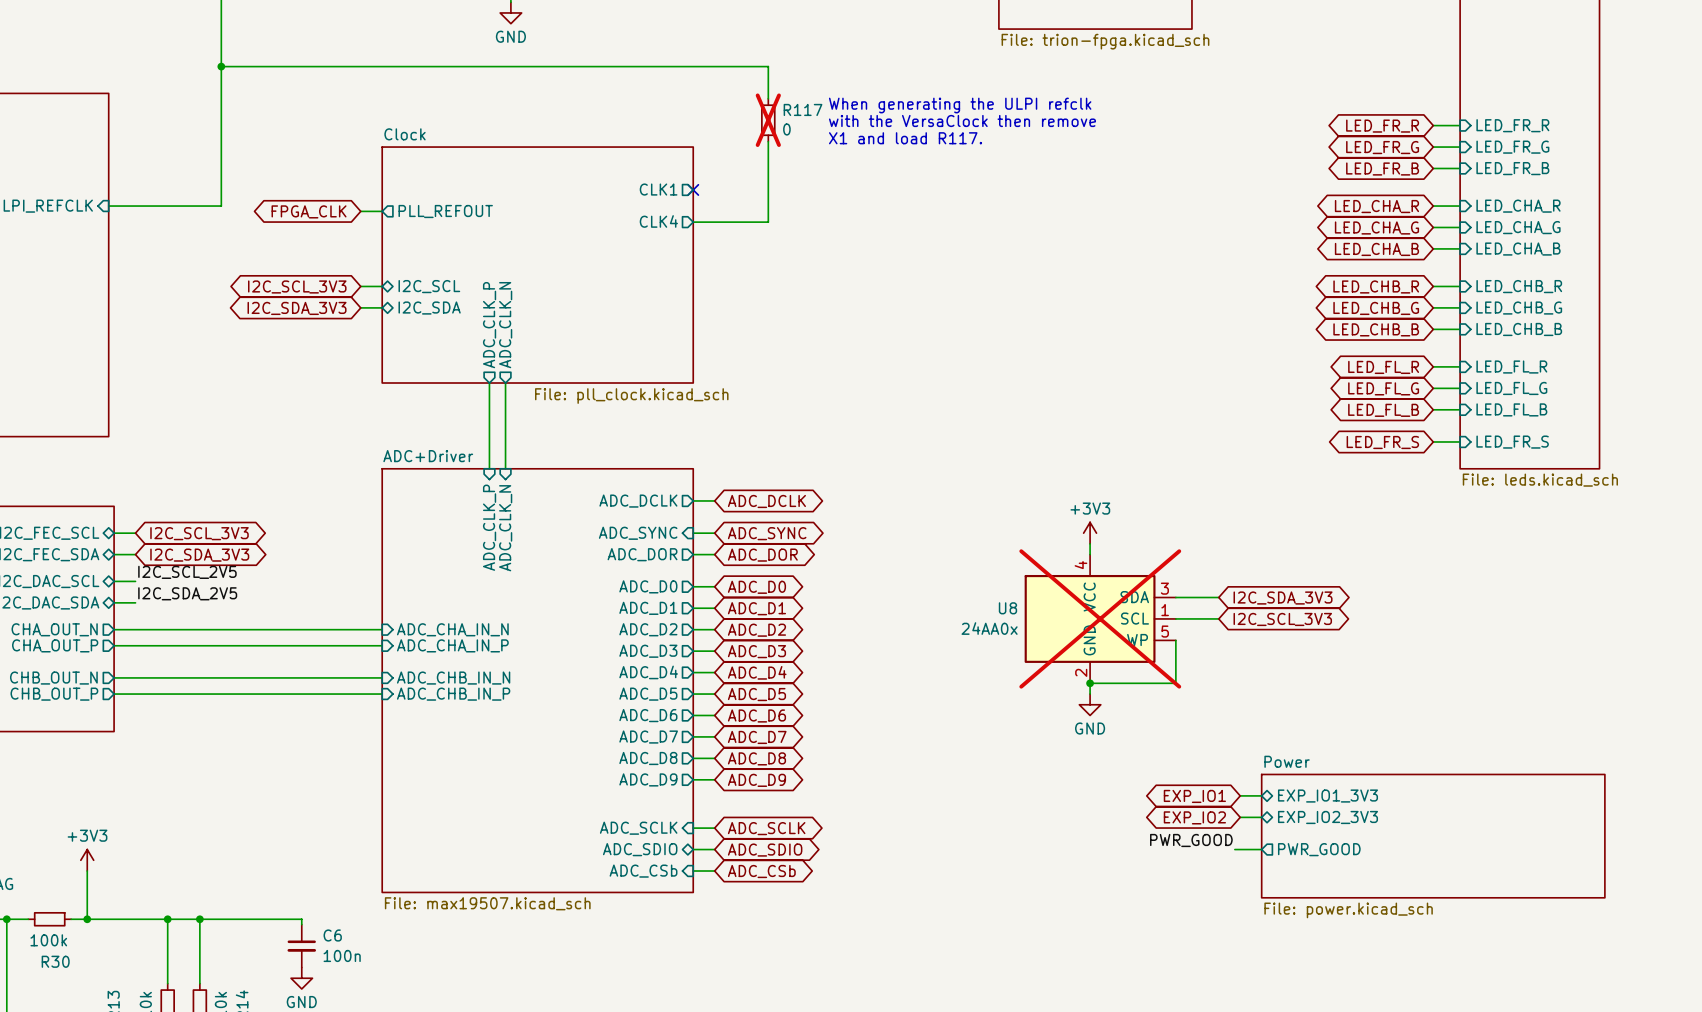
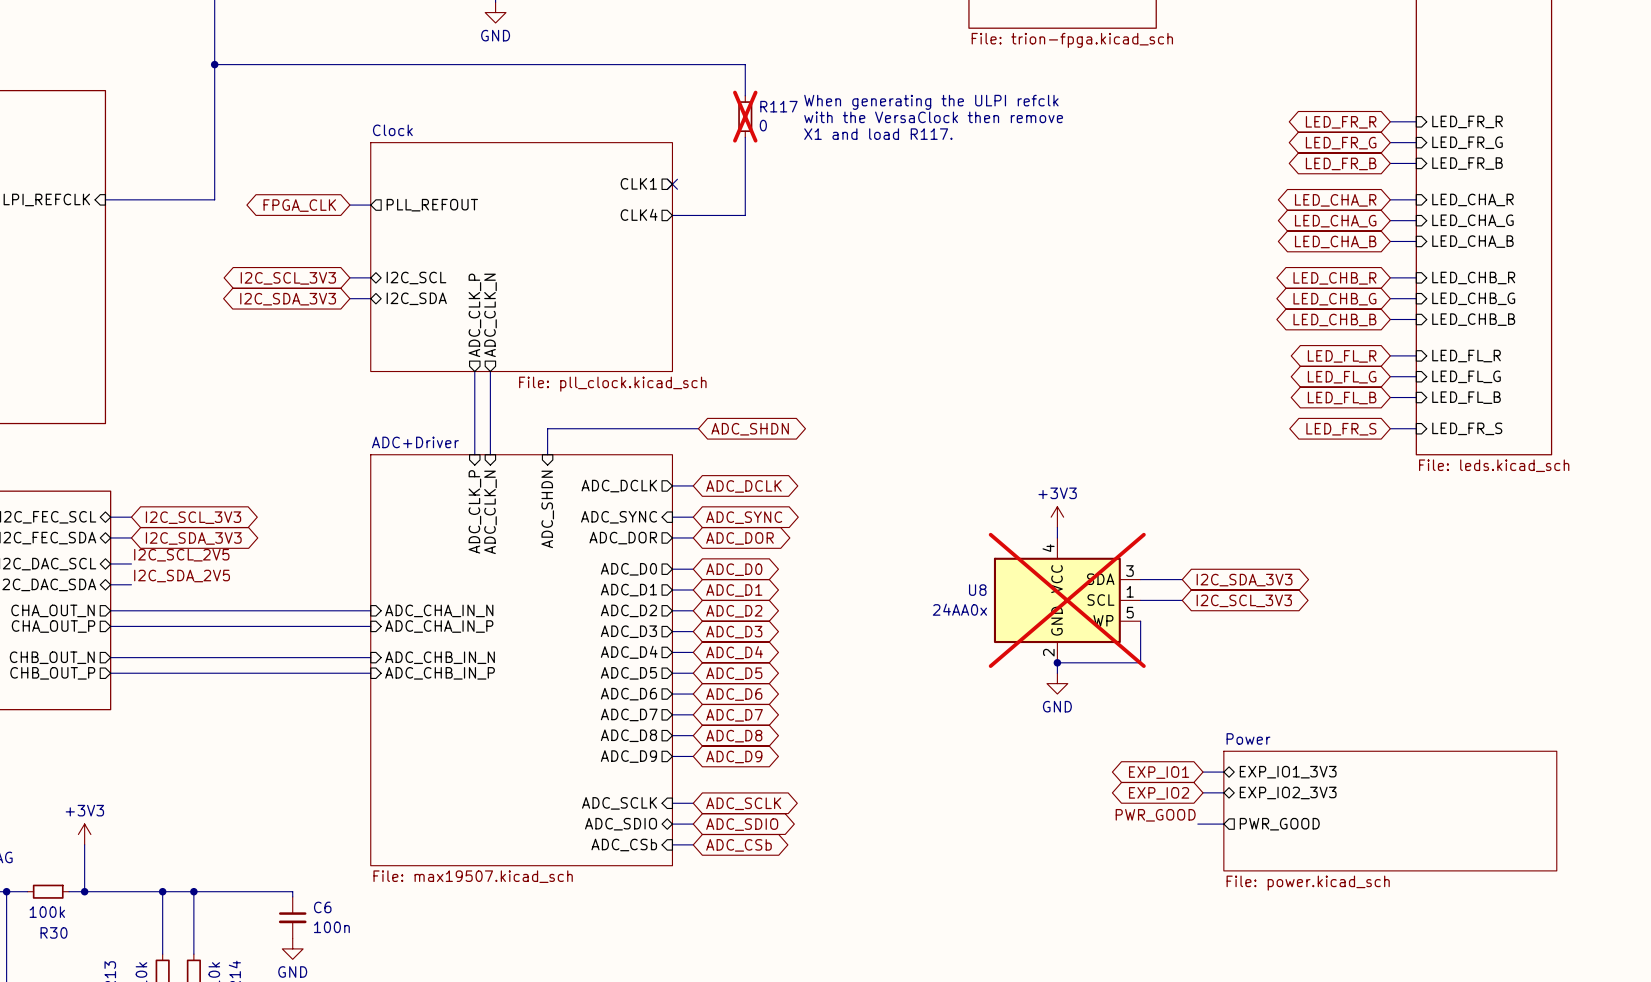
wire: none -> (698, 428) (547, 428) (547, 454)
global label: none -> ADC_SHDN (750, 429)
sheet pin: none -> ADC_SHDN (547, 509)

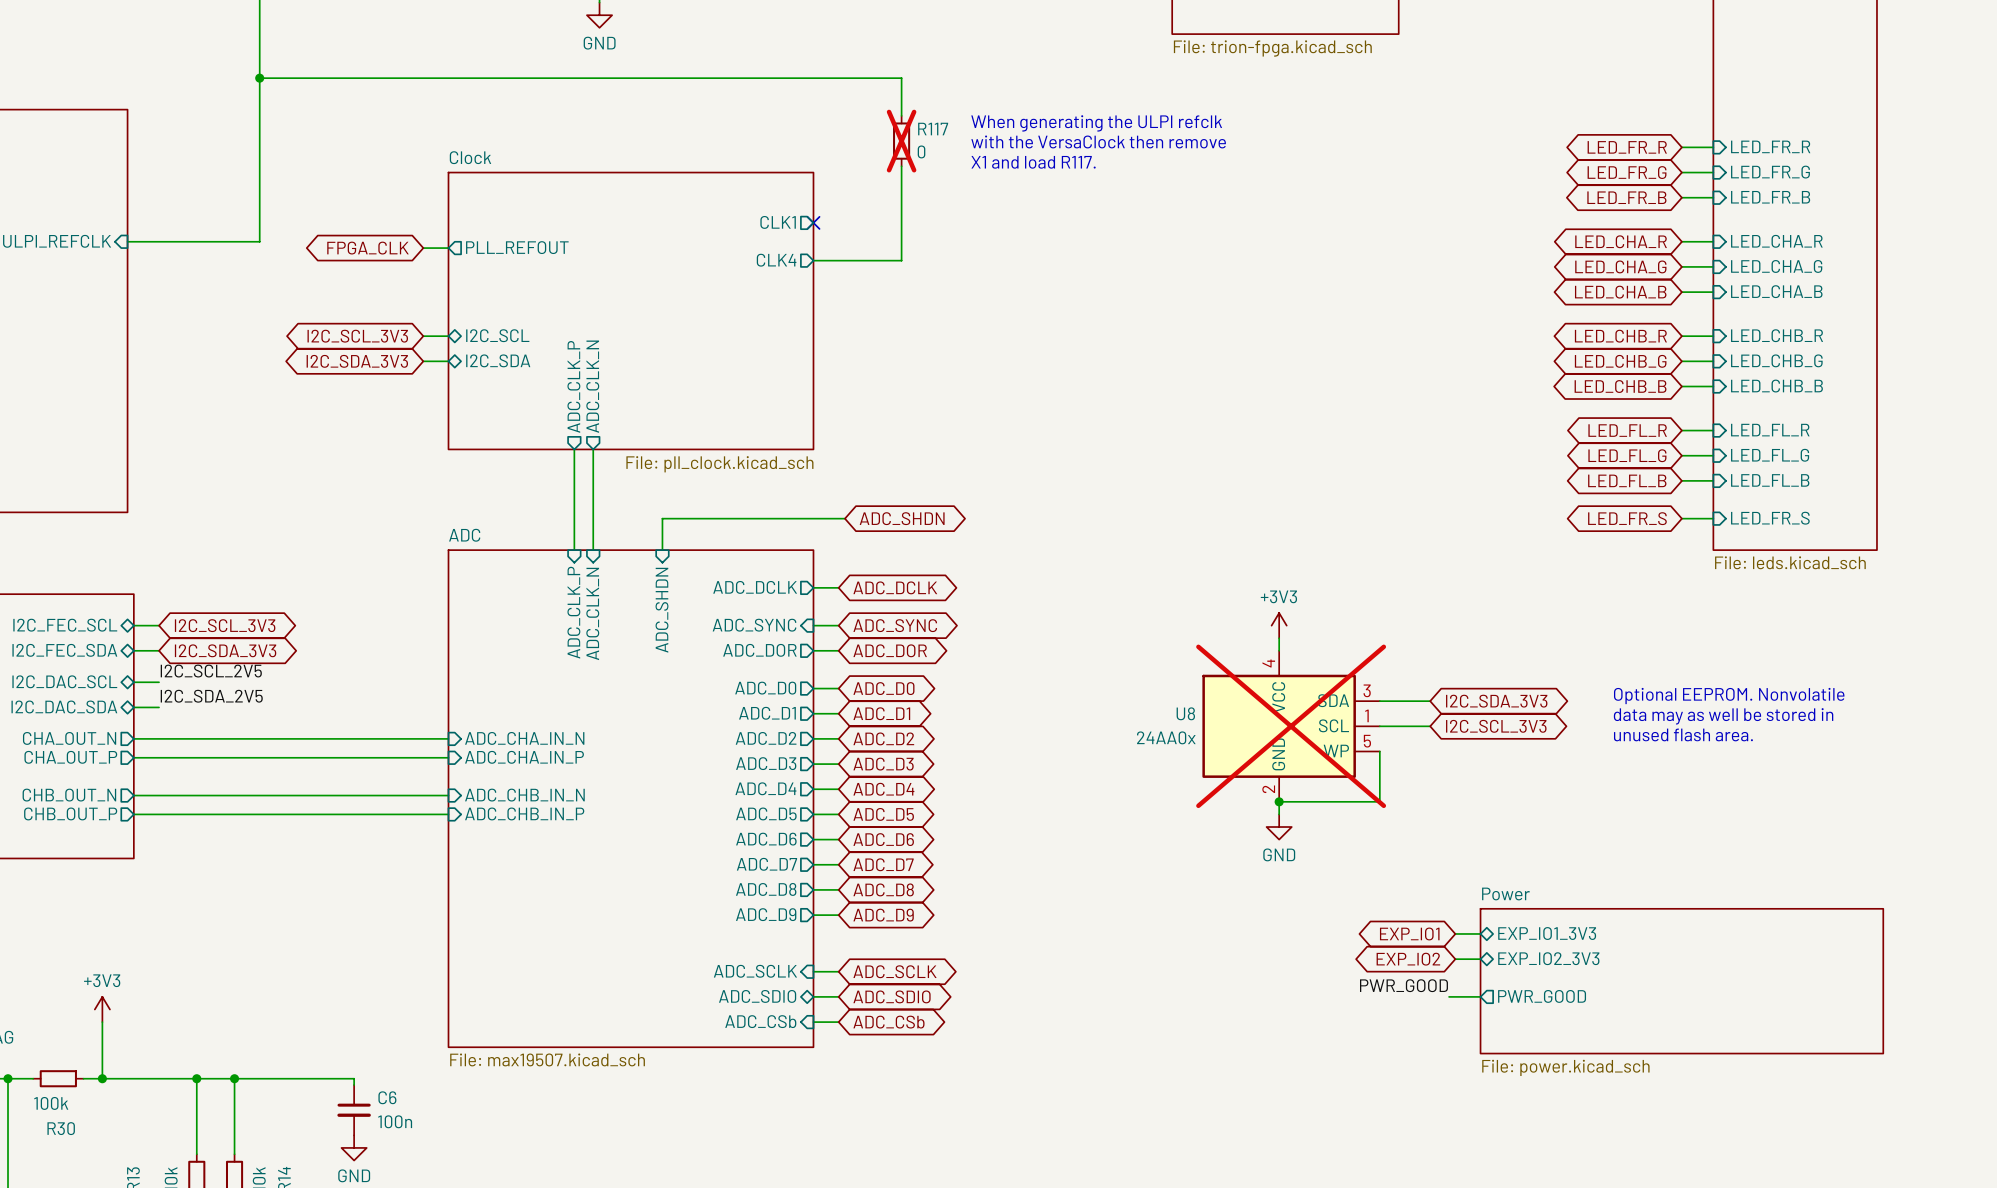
sheet ADC+Driver name: ADC+Driver (415, 442) -> ADC (464, 535)
text: none -> Optional EEPROM. Nonvolatile (1729, 696)
text: none -> data may as well be stored in (1723, 716)
text: none -> unused flash area. (1683, 734)

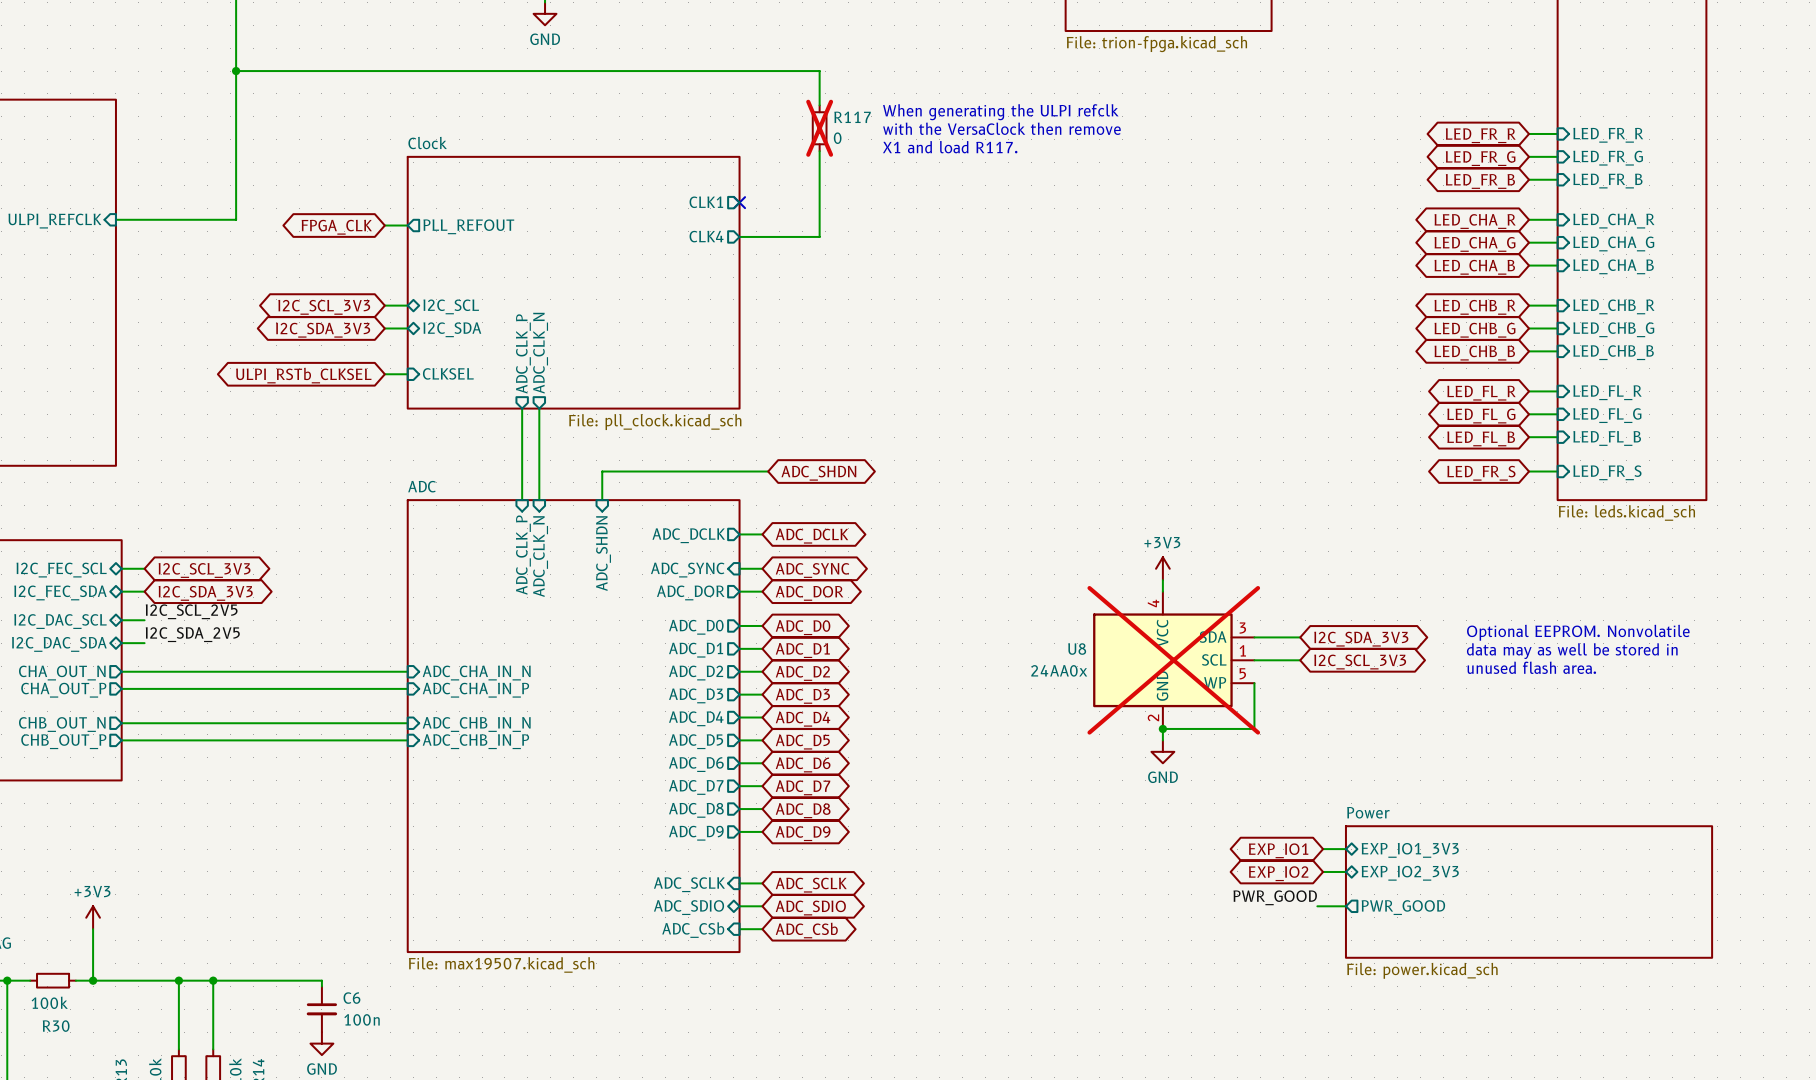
global label: none -> ULPI_RSTb_CLKSEL (303, 375)
wire: none -> (384, 374) (407, 374)
sheet pin: none -> CLKSEL (448, 373)

